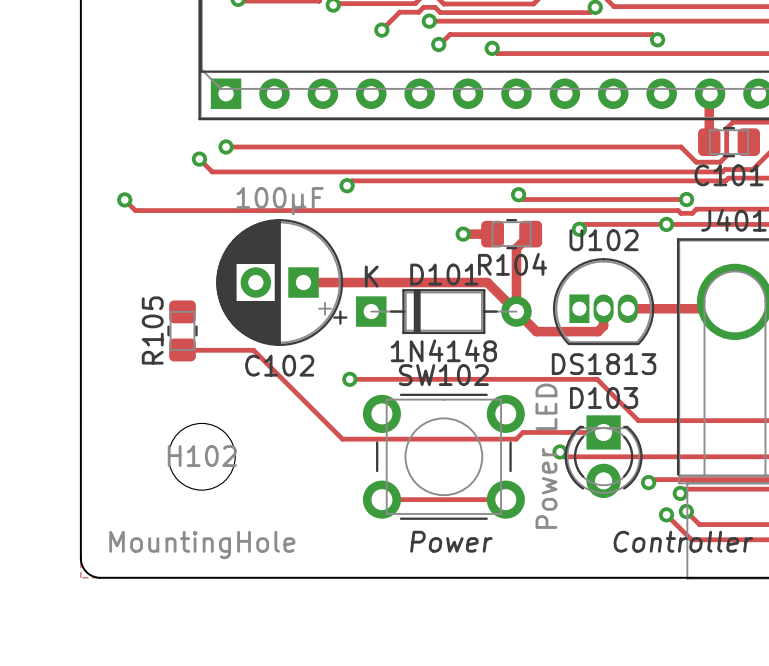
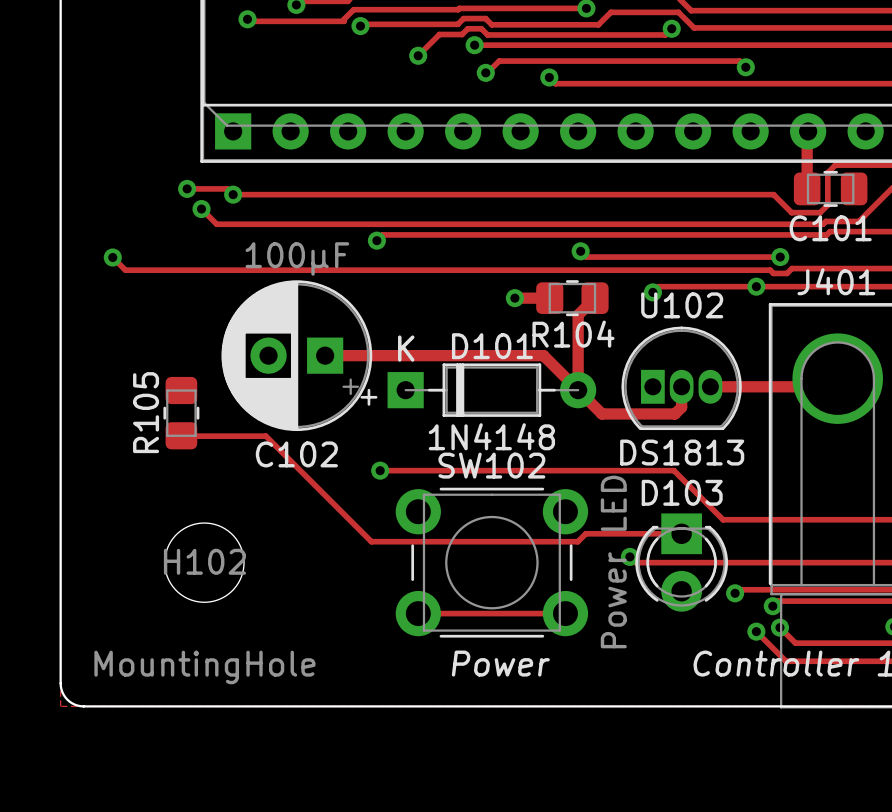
track: none -> (187, 188) (227, 188) (233, 194)
via: none -> (187, 188)

